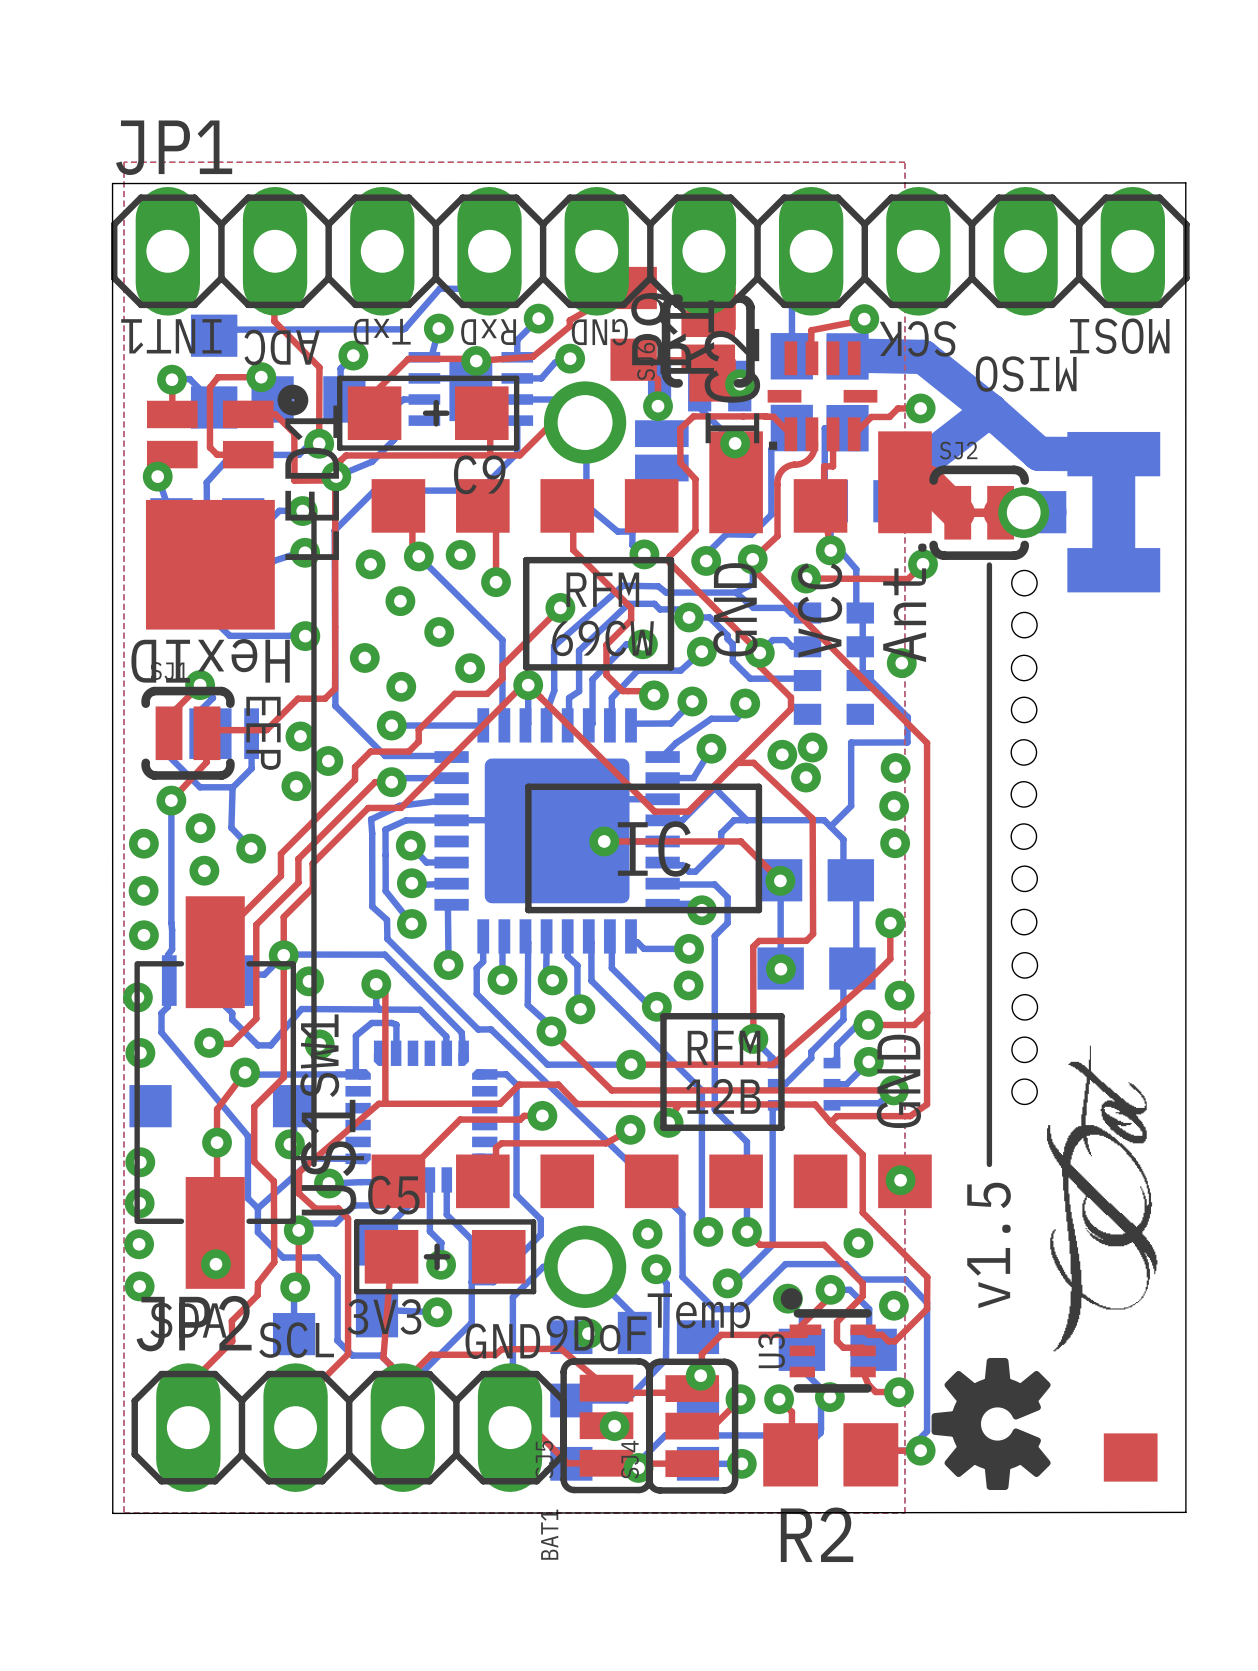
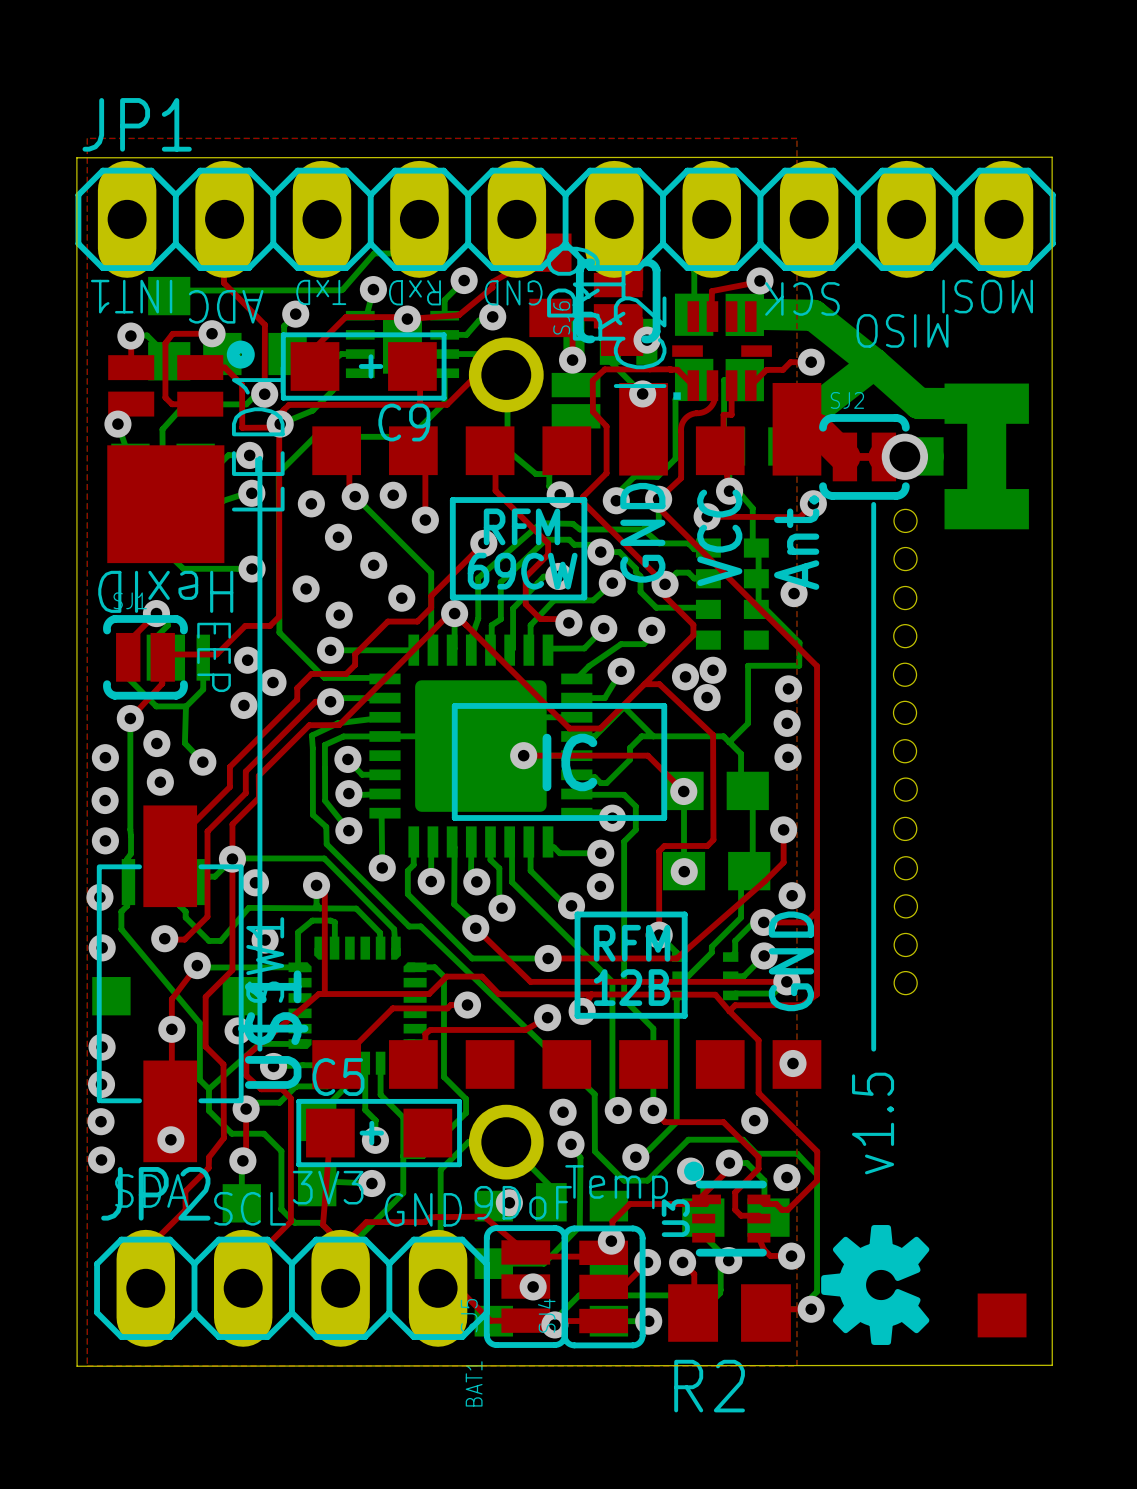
drawing: [1047, 1045, 1158, 1352] -> none

